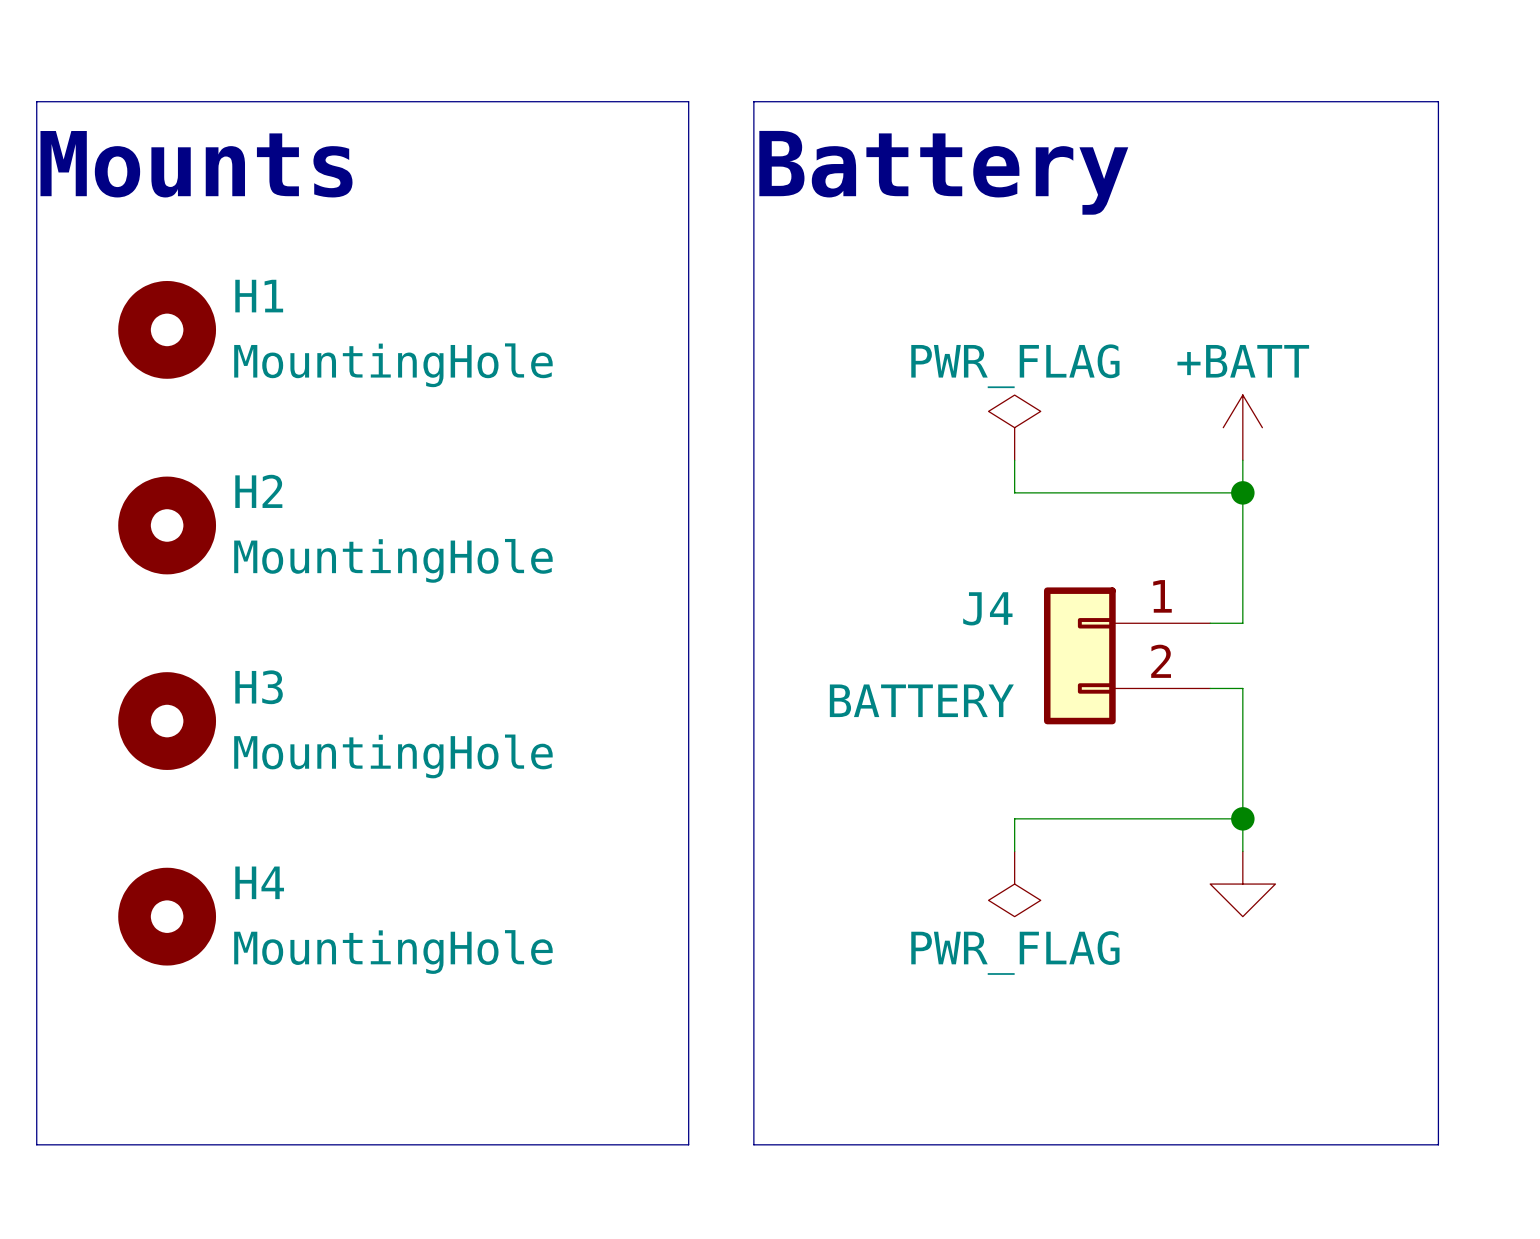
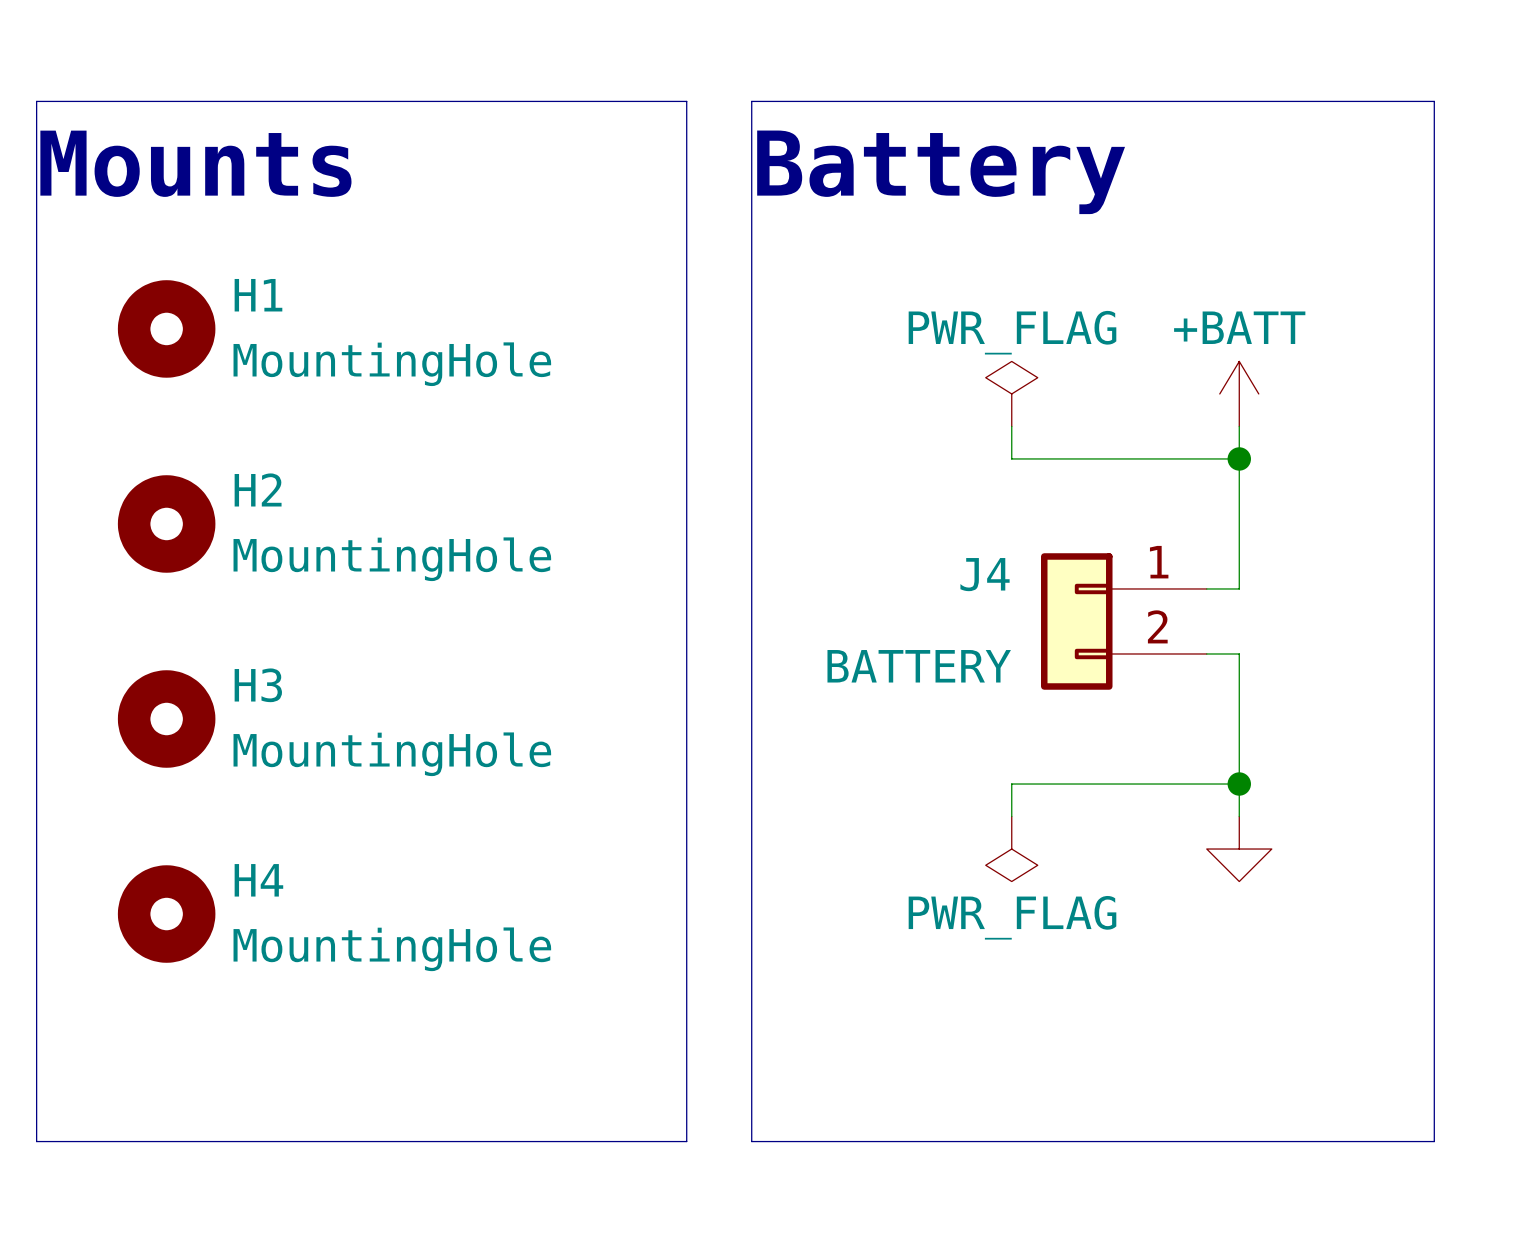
wire: none -> (1011, 426) (1011, 458) (1239, 458) (1239, 426)
power symbol position: PWR_FLAG (1014, 427) -> PWR_FLAG (1011, 393)
power symbol position: +BATT (1242, 427) -> +BATT (1239, 393)
wire: (1014, 460) (1014, 492) (1242, 492) -> none
junction position: (1242, 492) -> (1239, 458)
wire: (1242, 590) (1242, 623) (1210, 623) -> (1239, 588) (1206, 588)
J4 position: (1127, 655) -> (1123, 621)
wire: (1210, 688) (1242, 688) -> (1206, 653) (1239, 653) (1239, 686)
wire: none -> (1239, 784) (1011, 784) (1011, 816)
junction position: (1242, 818) -> (1239, 784)
wire: (1014, 851) (1014, 818) (1242, 818) (1242, 851) -> none
power symbol position: PWR_FLAG (1014, 884) -> PWR_FLAG (1011, 849)
power symbol position: (1242, 884) -> (1239, 849)

